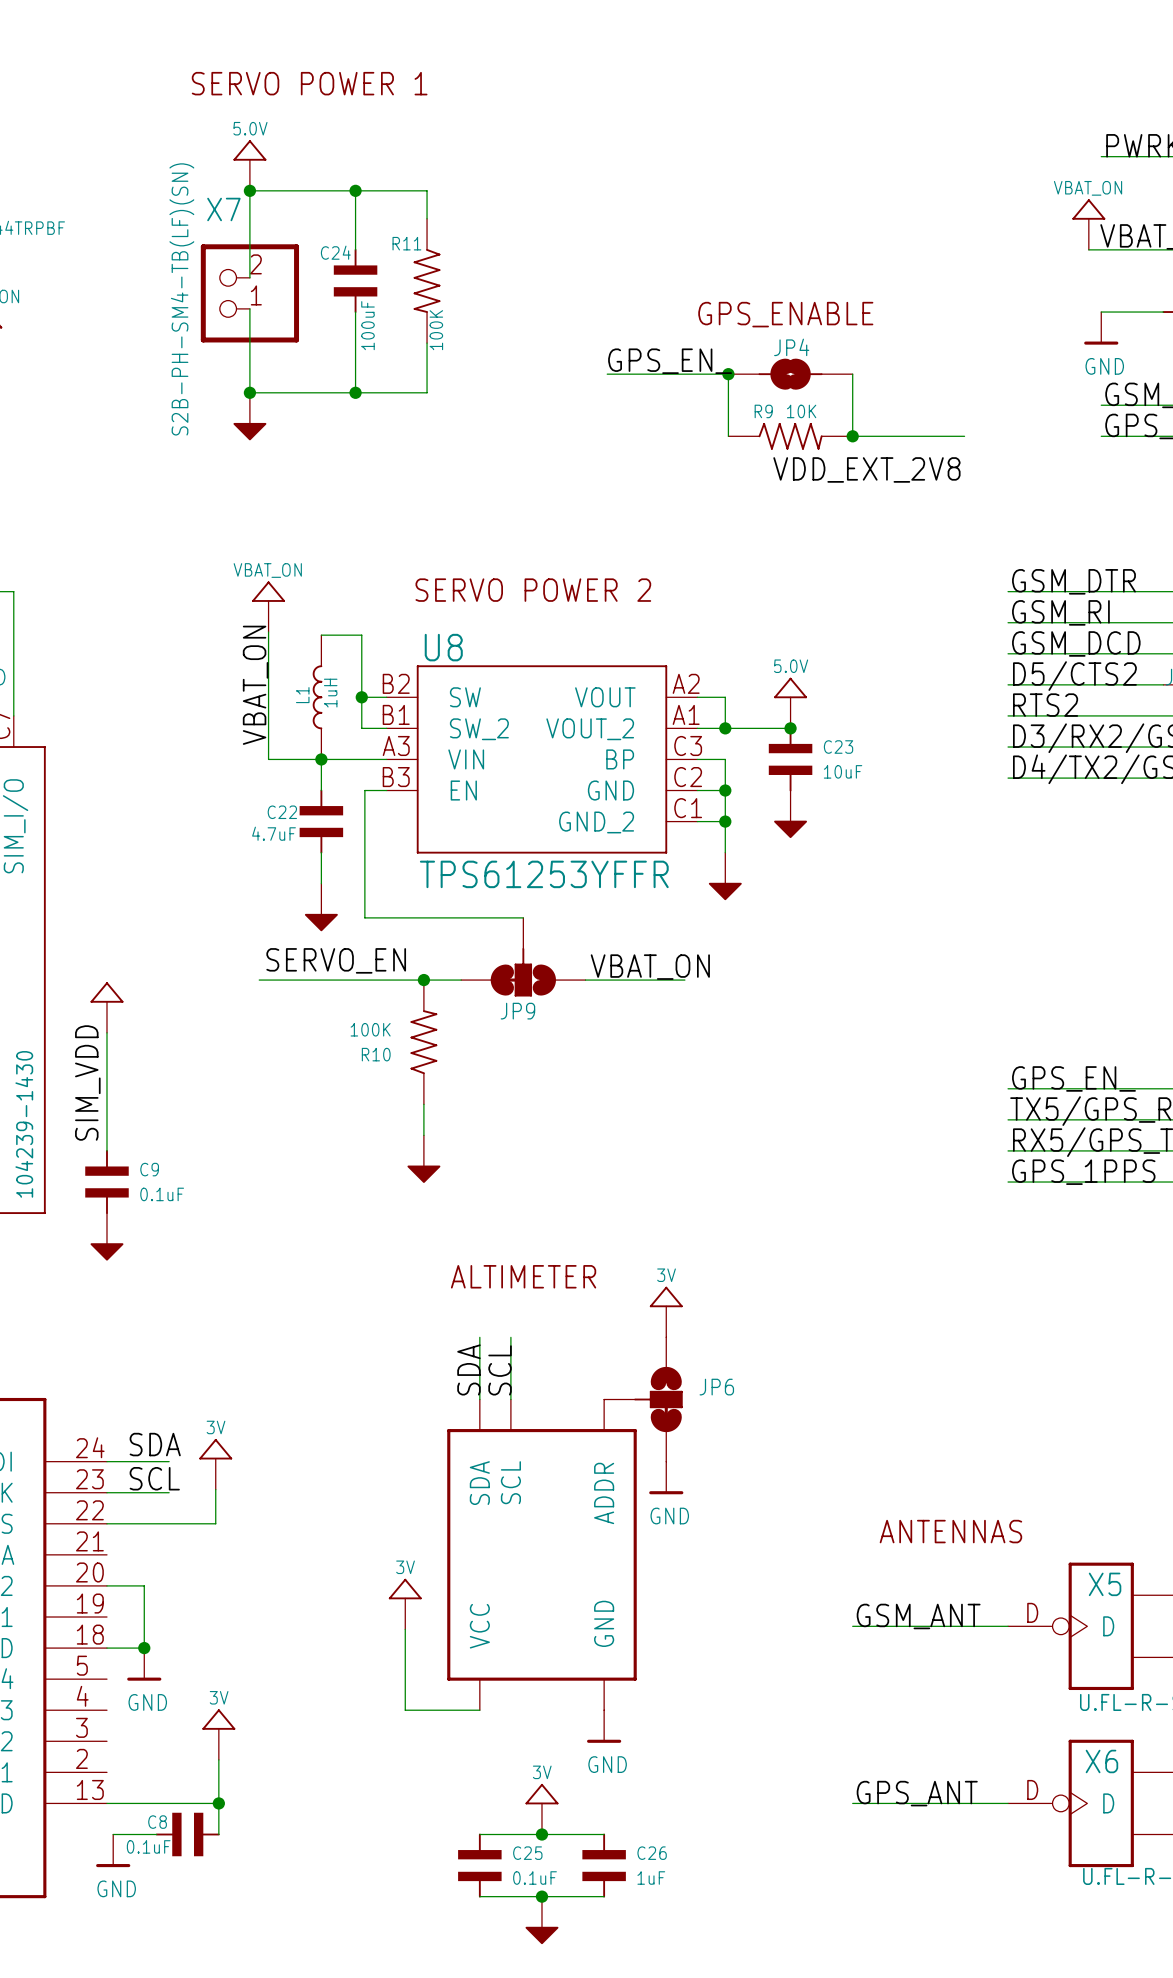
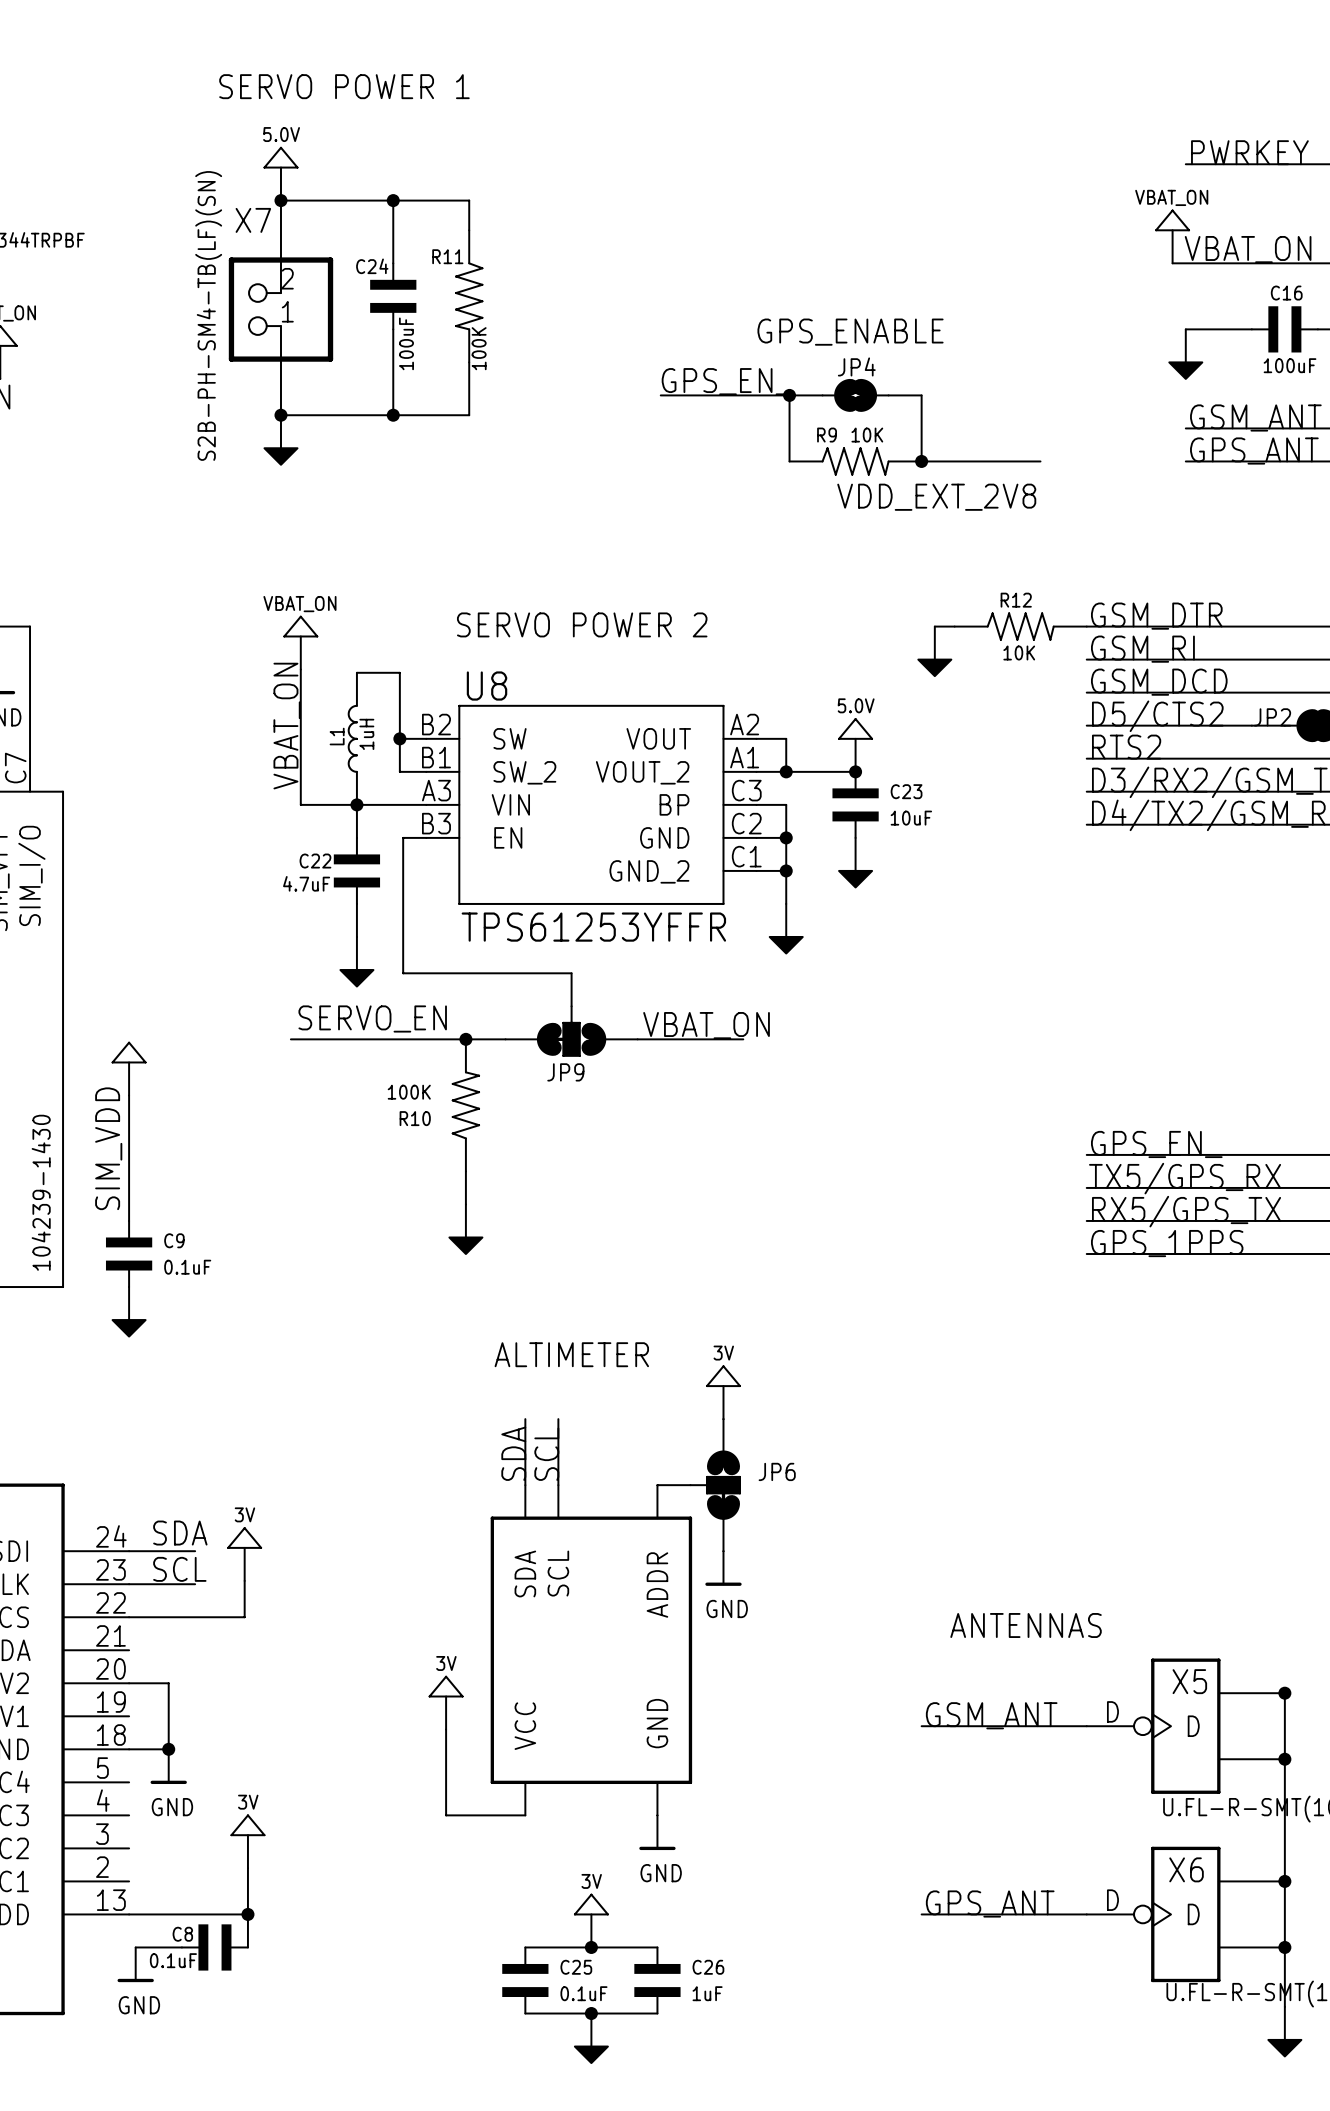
power symbol shape: [1084, 312, 1119, 345] -> [1168, 329, 1204, 380]
power symbol text: GND (1104, 366) -> none
wire: none -> (934, 626) (954, 626)
R12: none -> 10K (1020, 626)
power symbol: none -> (934, 651)

